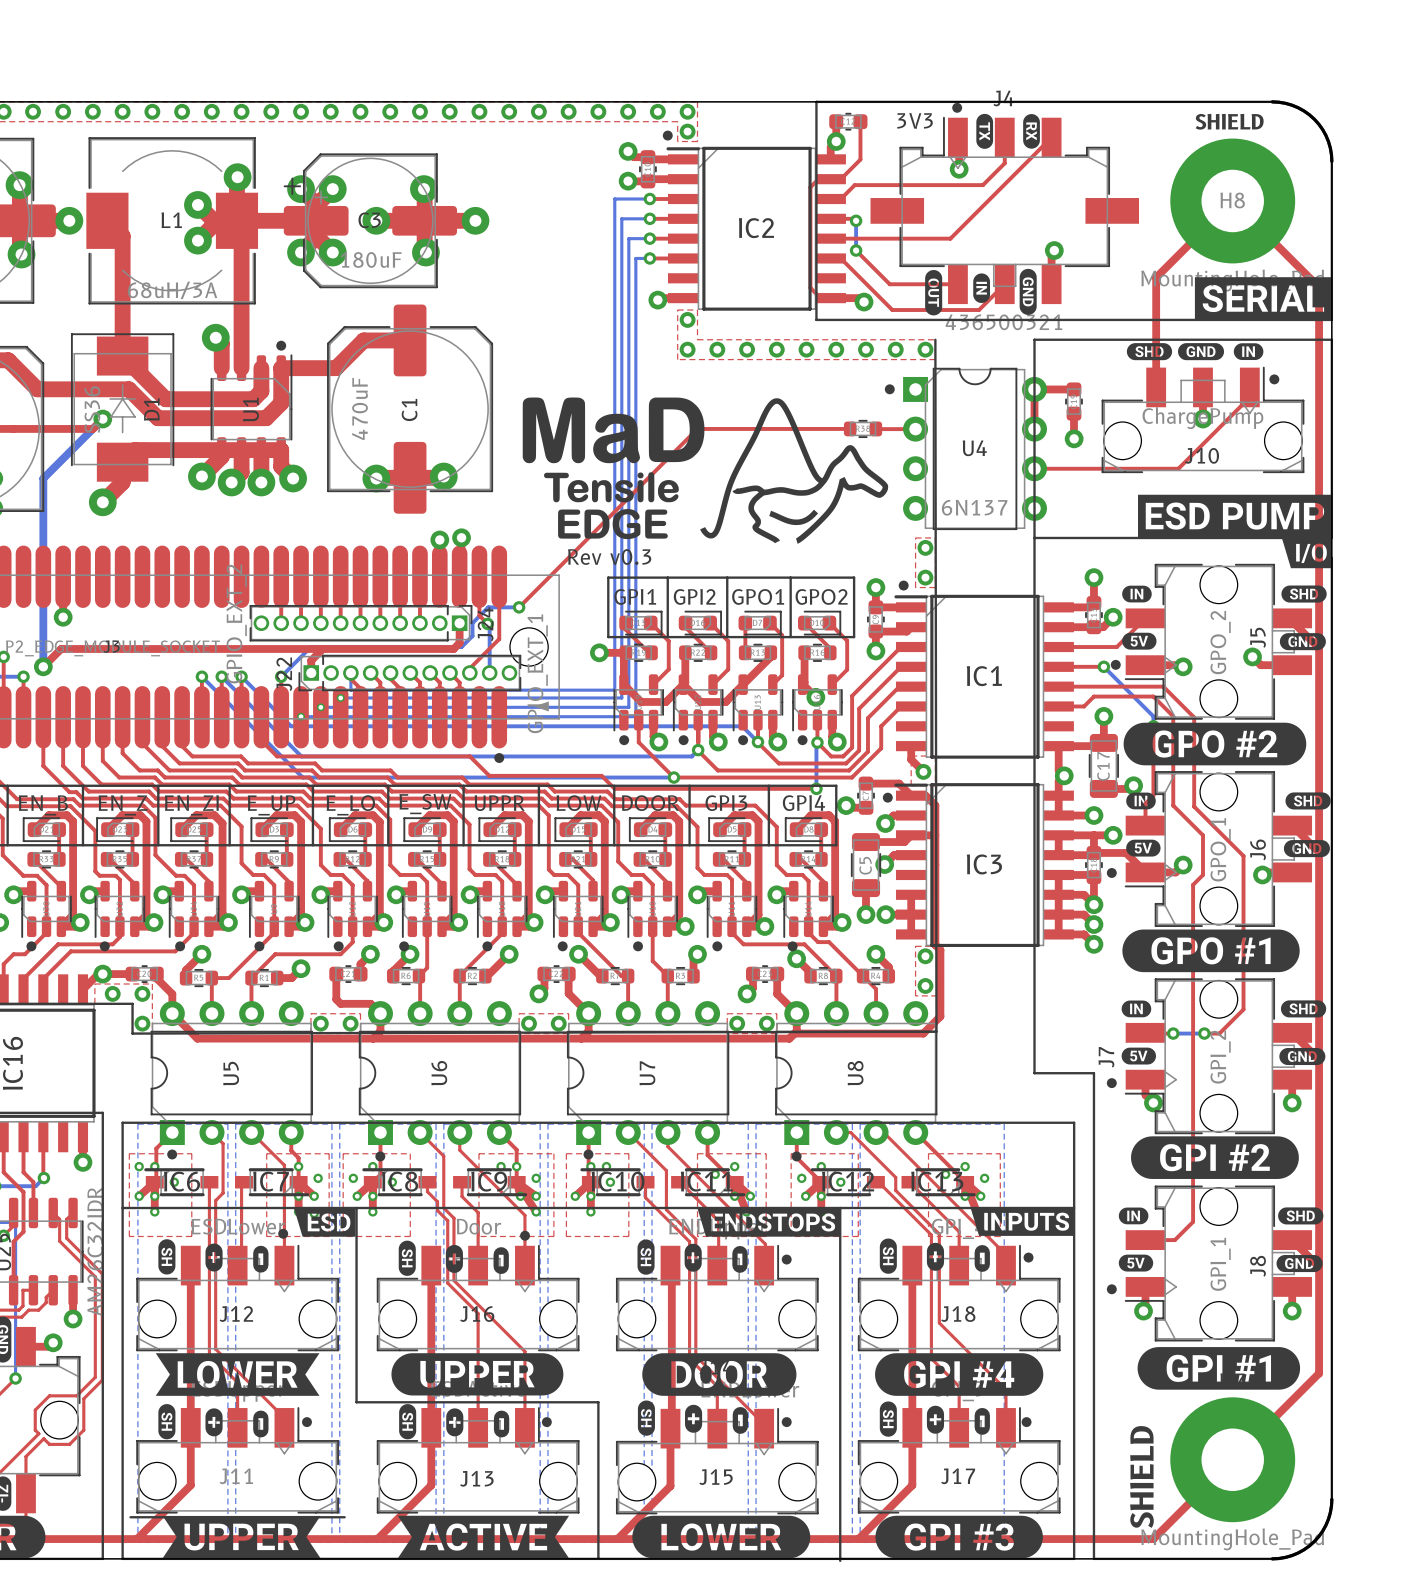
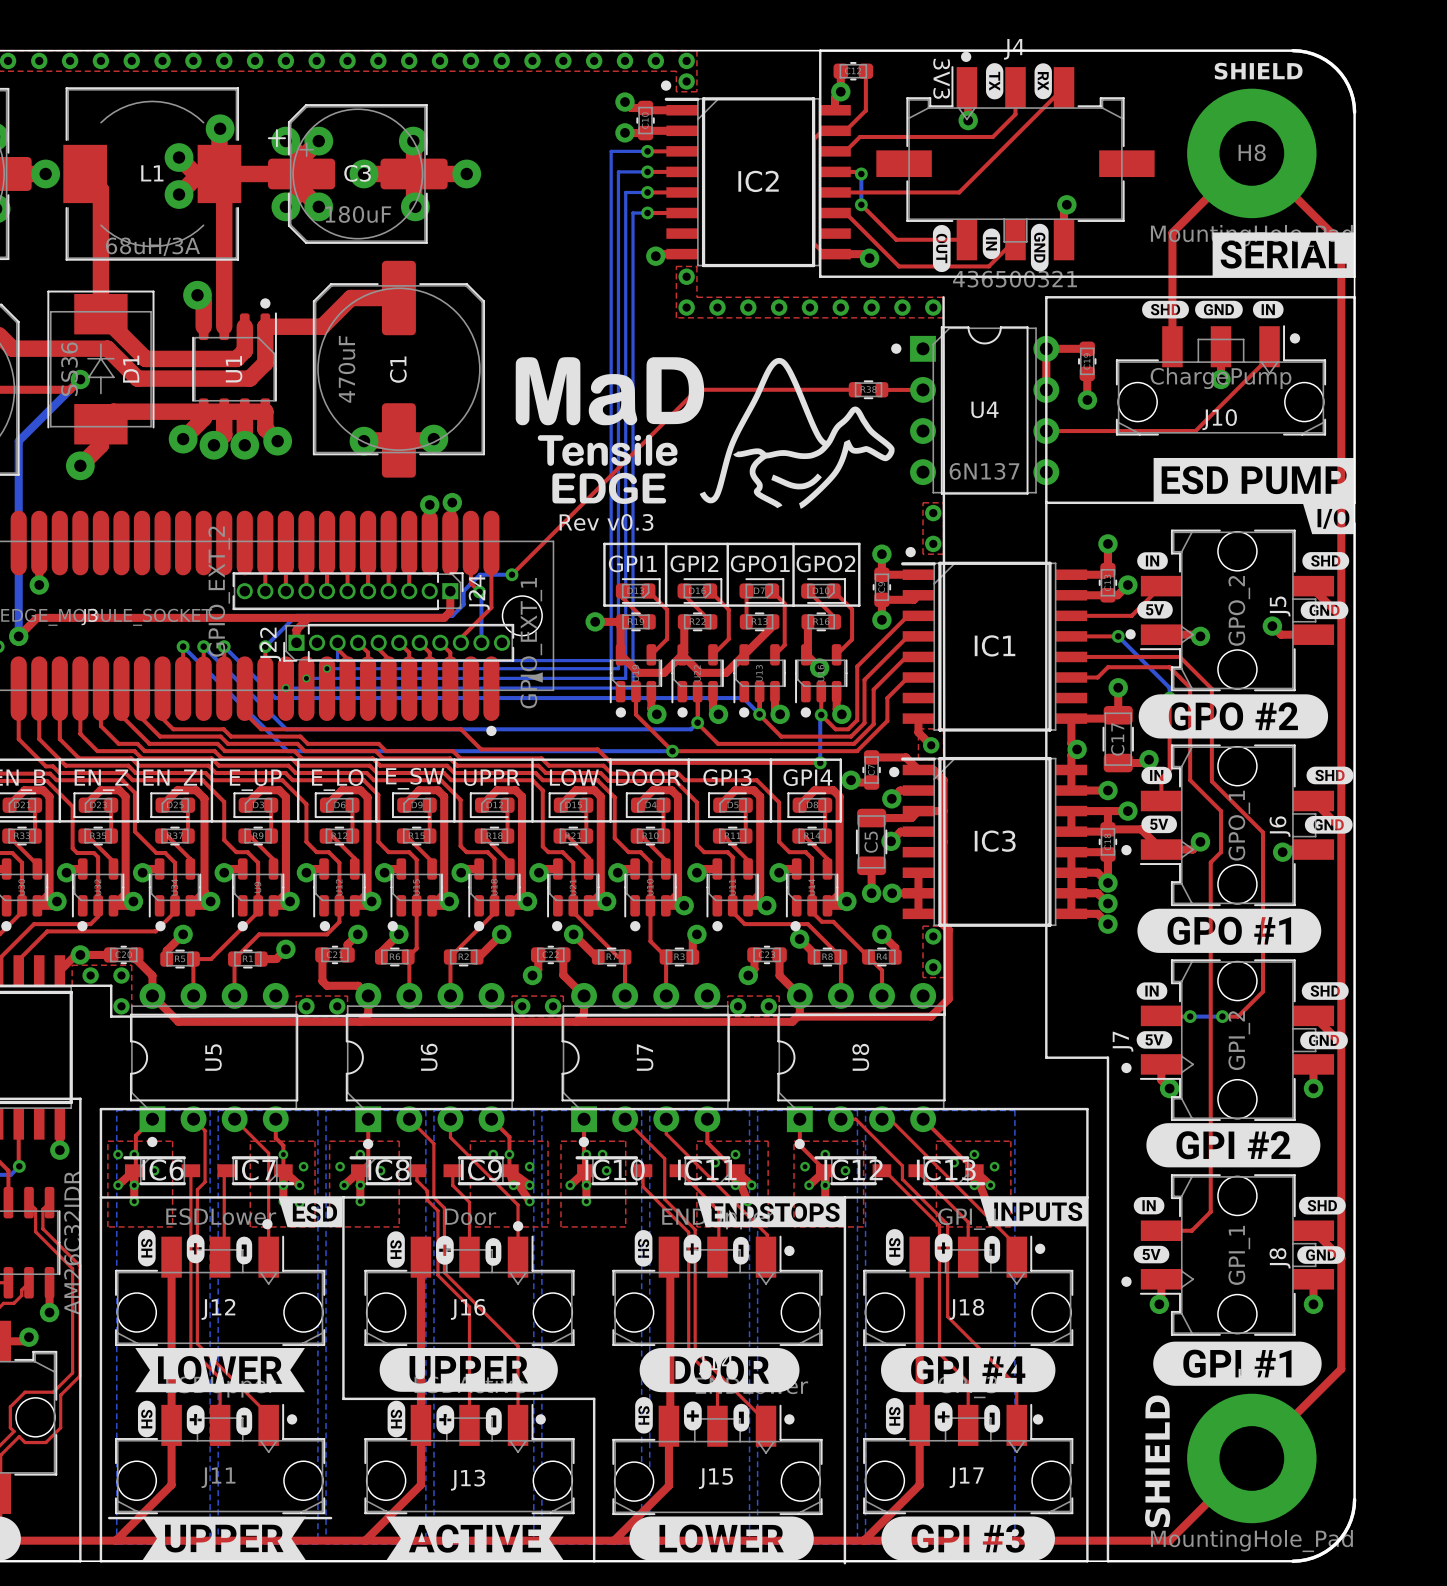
text rotation: 0° (915, 120) -> 90° clockwise (941, 78)

